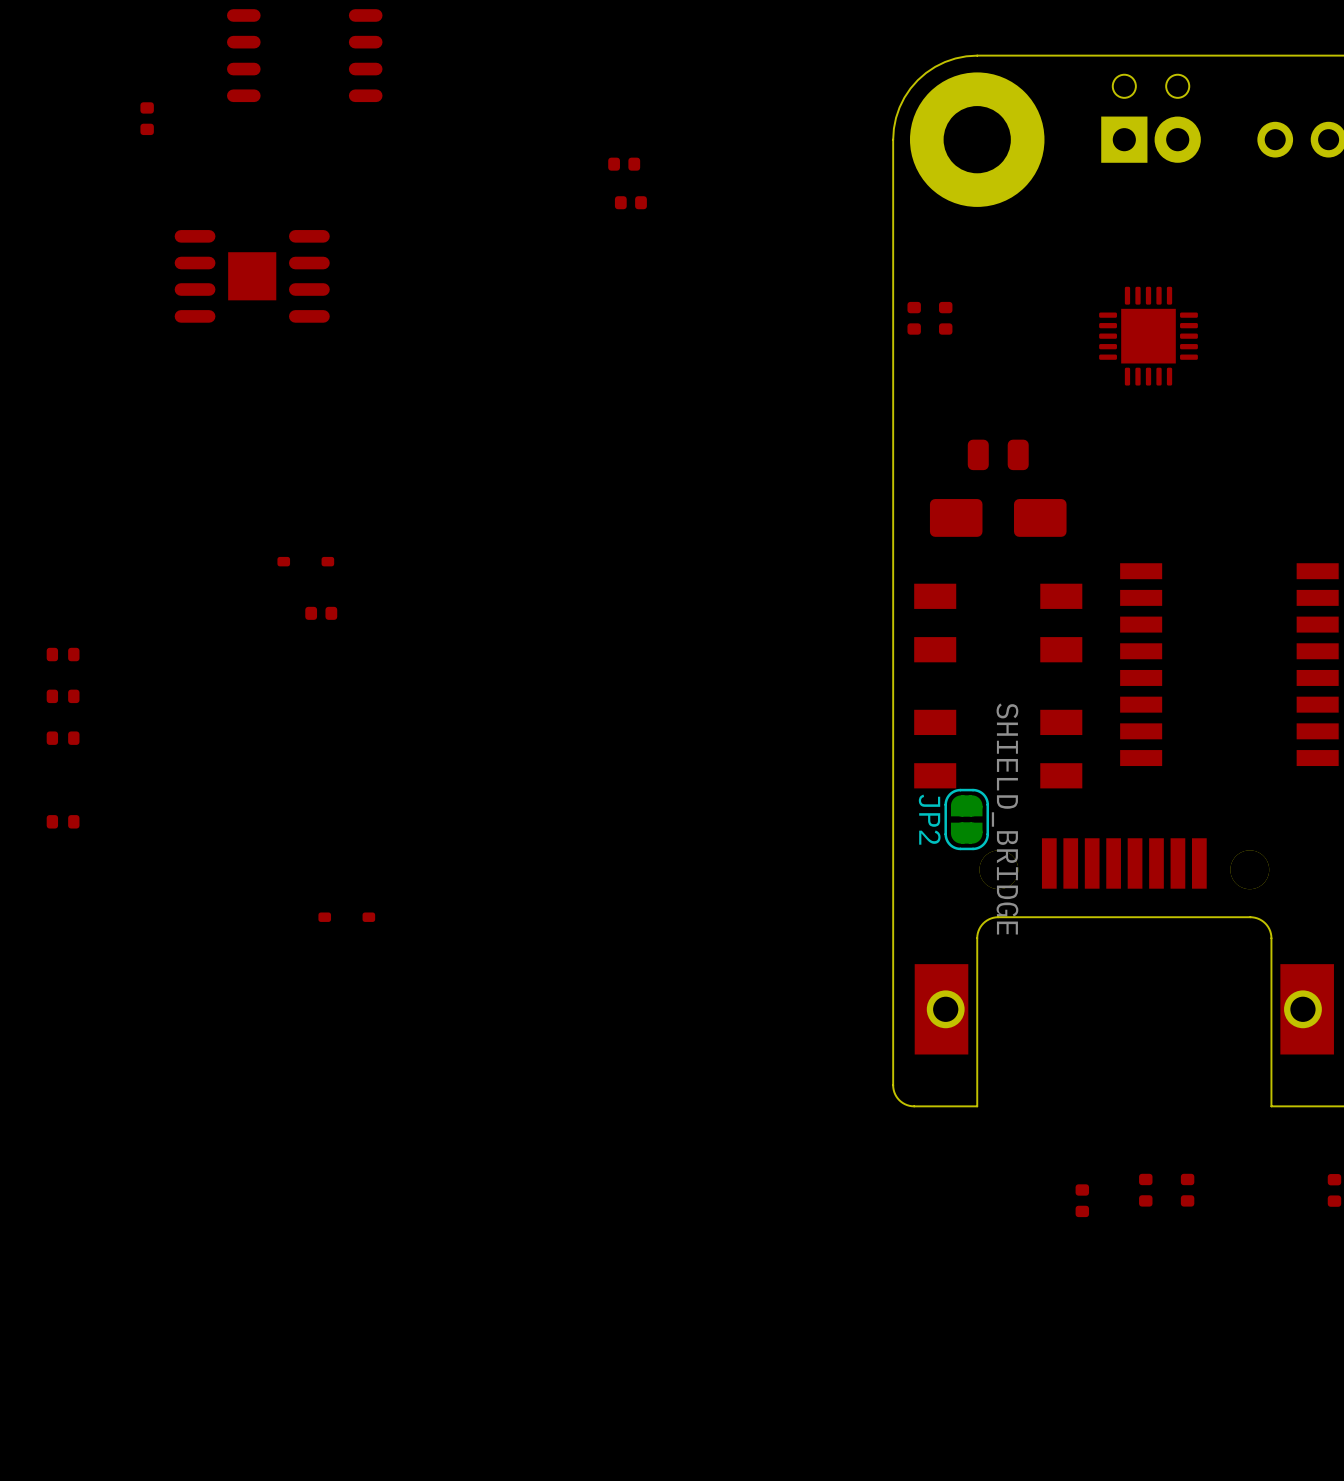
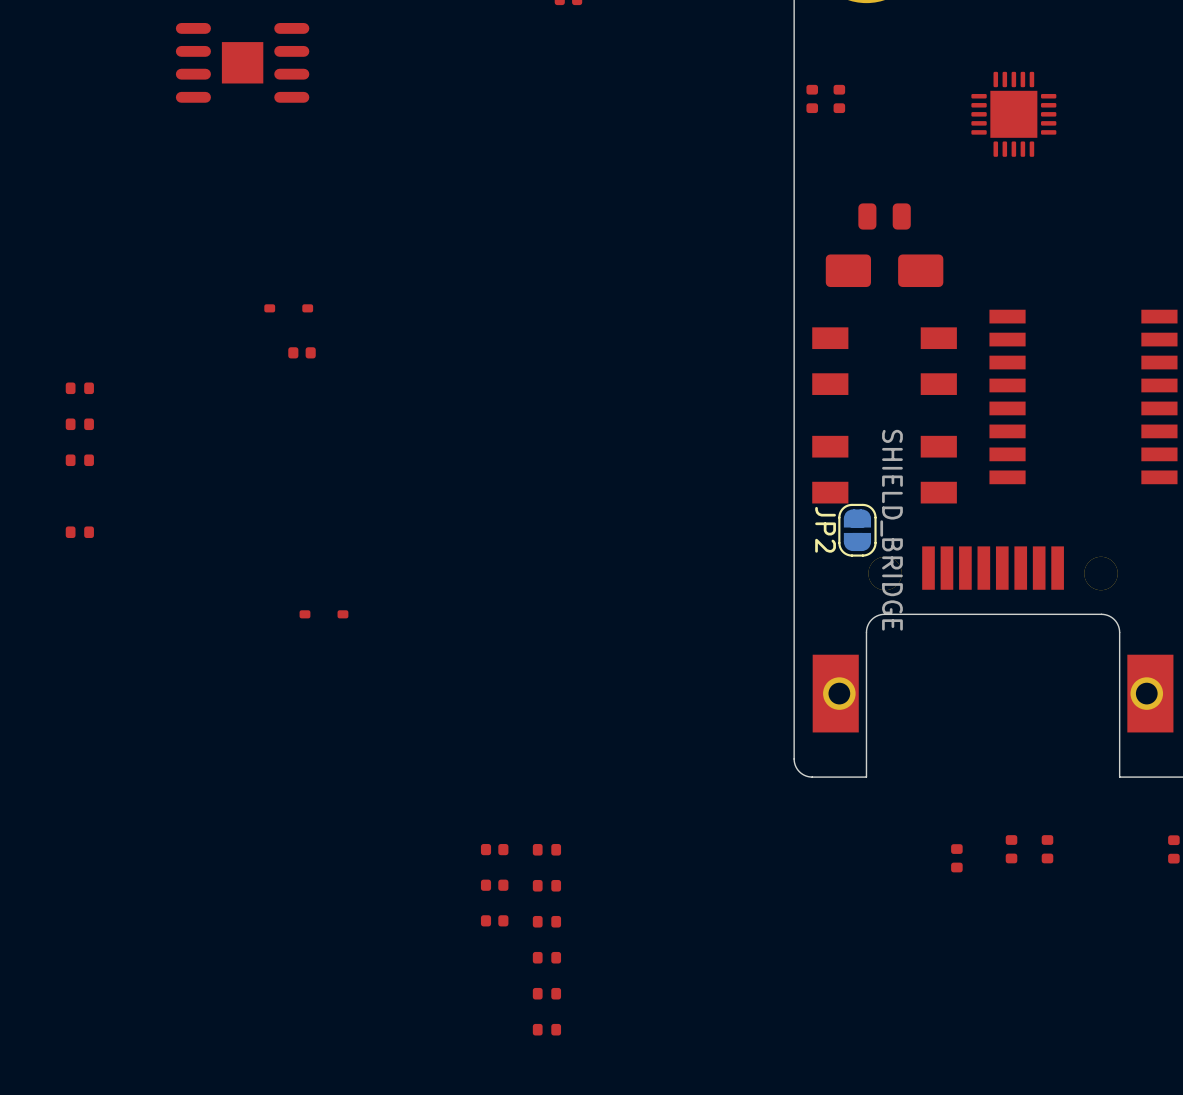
part: none -> (494, 849)
part: none -> (546, 849)
part: none -> (494, 885)
part: none -> (546, 885)
part: none -> (494, 920)
part: none -> (546, 921)
part: none -> (546, 957)
part: none -> (546, 993)
part: none -> (546, 1029)

